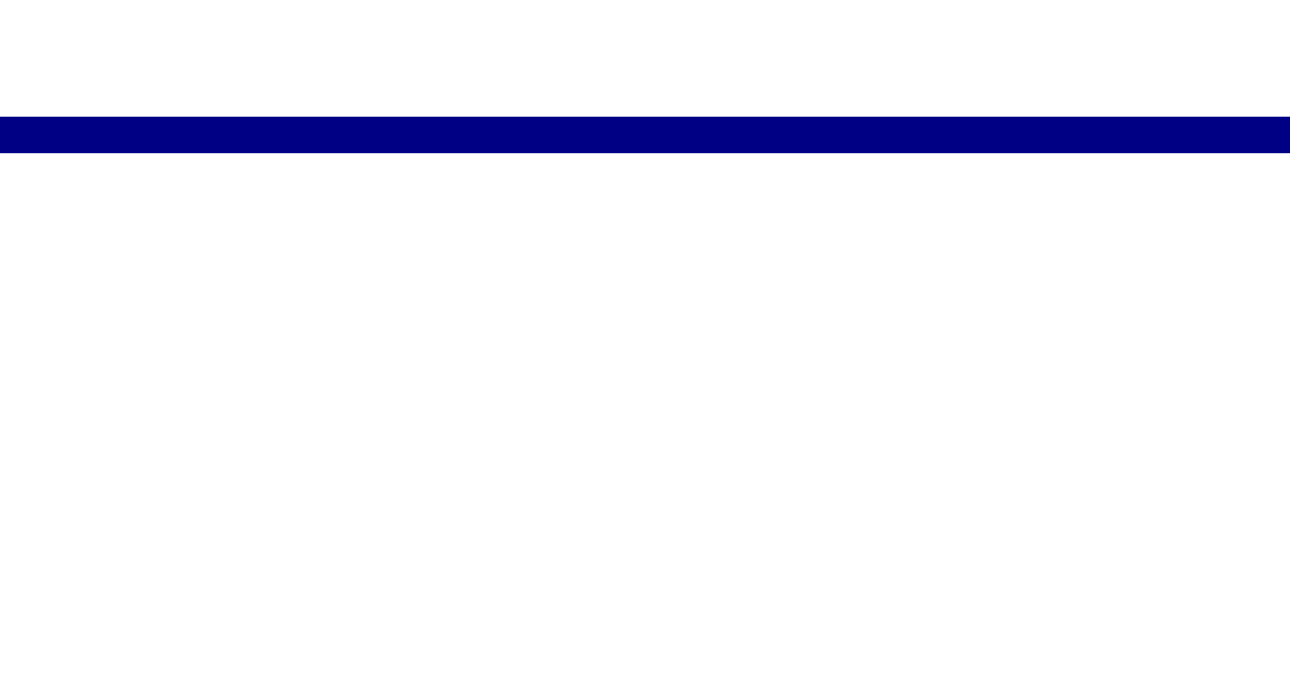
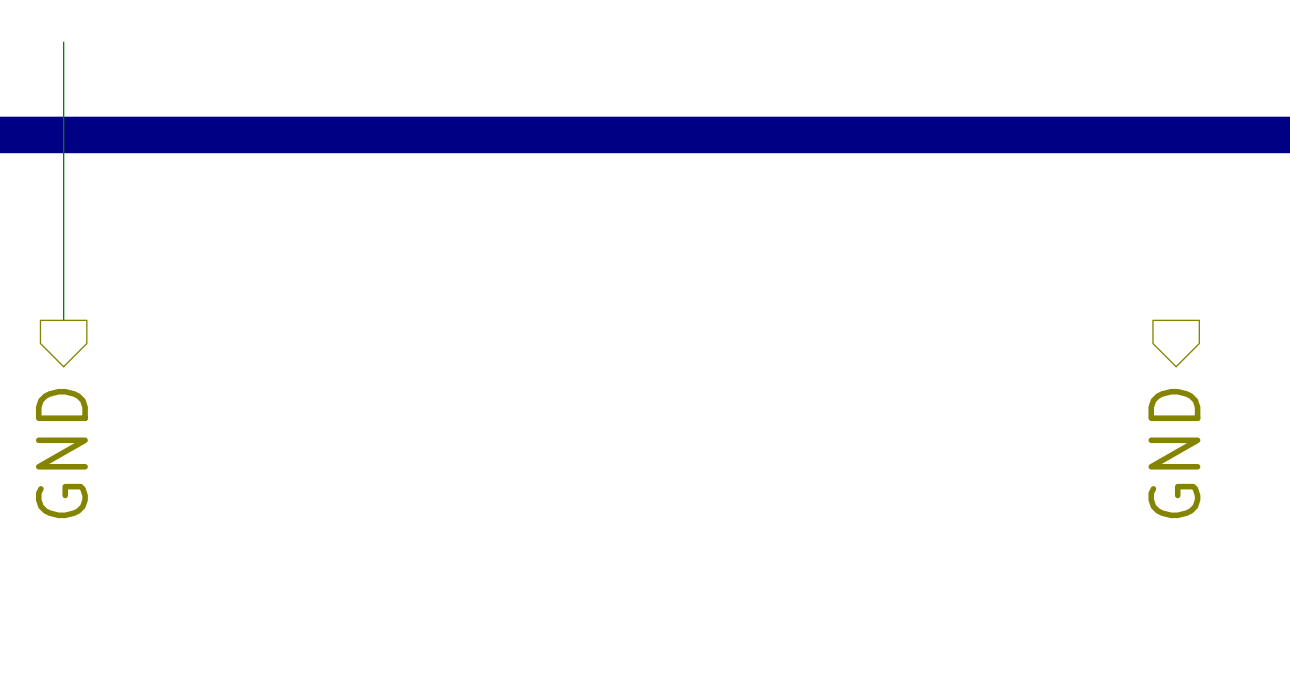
wire: none -> (63, 42) (63, 320)
hierarchical label: none -> GND (61, 453)
hierarchical label: none -> GND (1174, 453)

